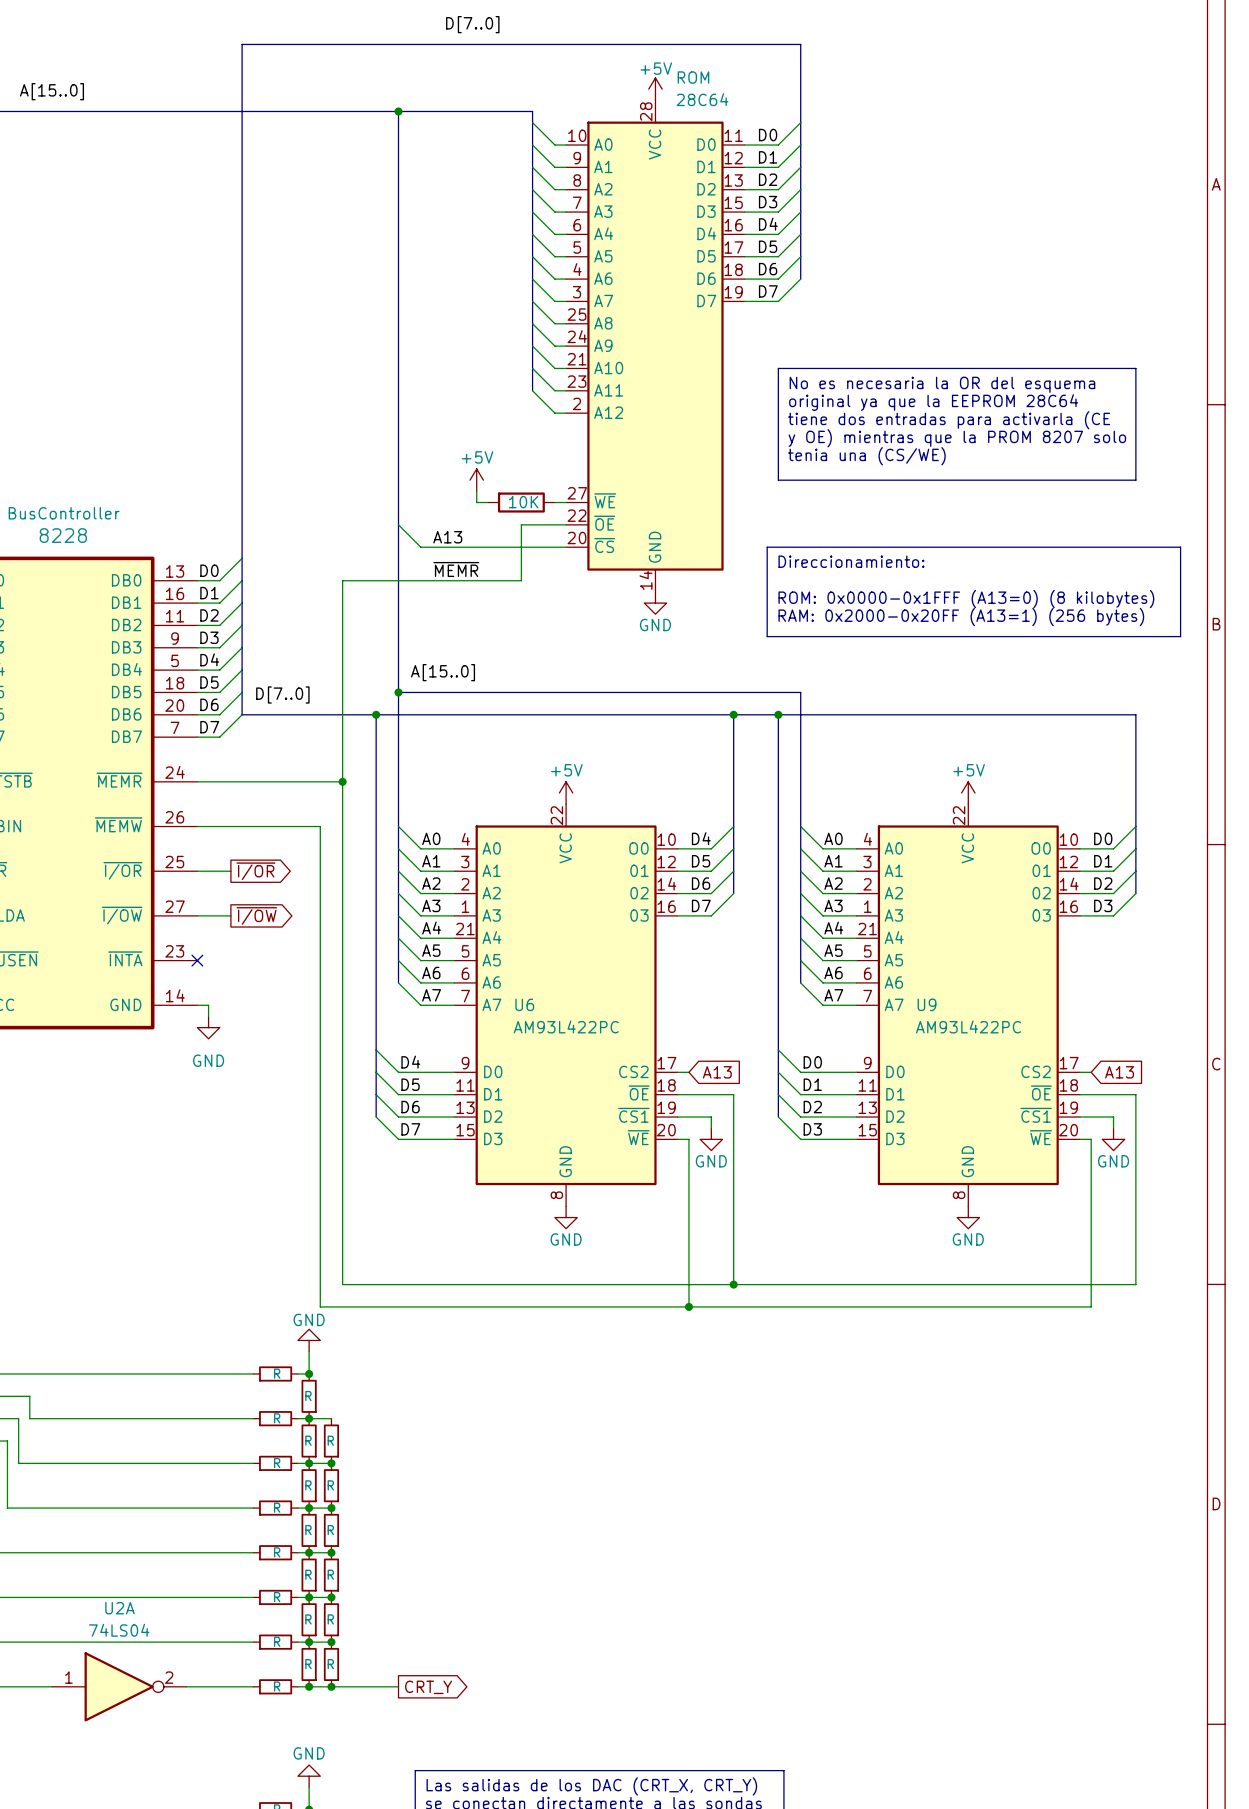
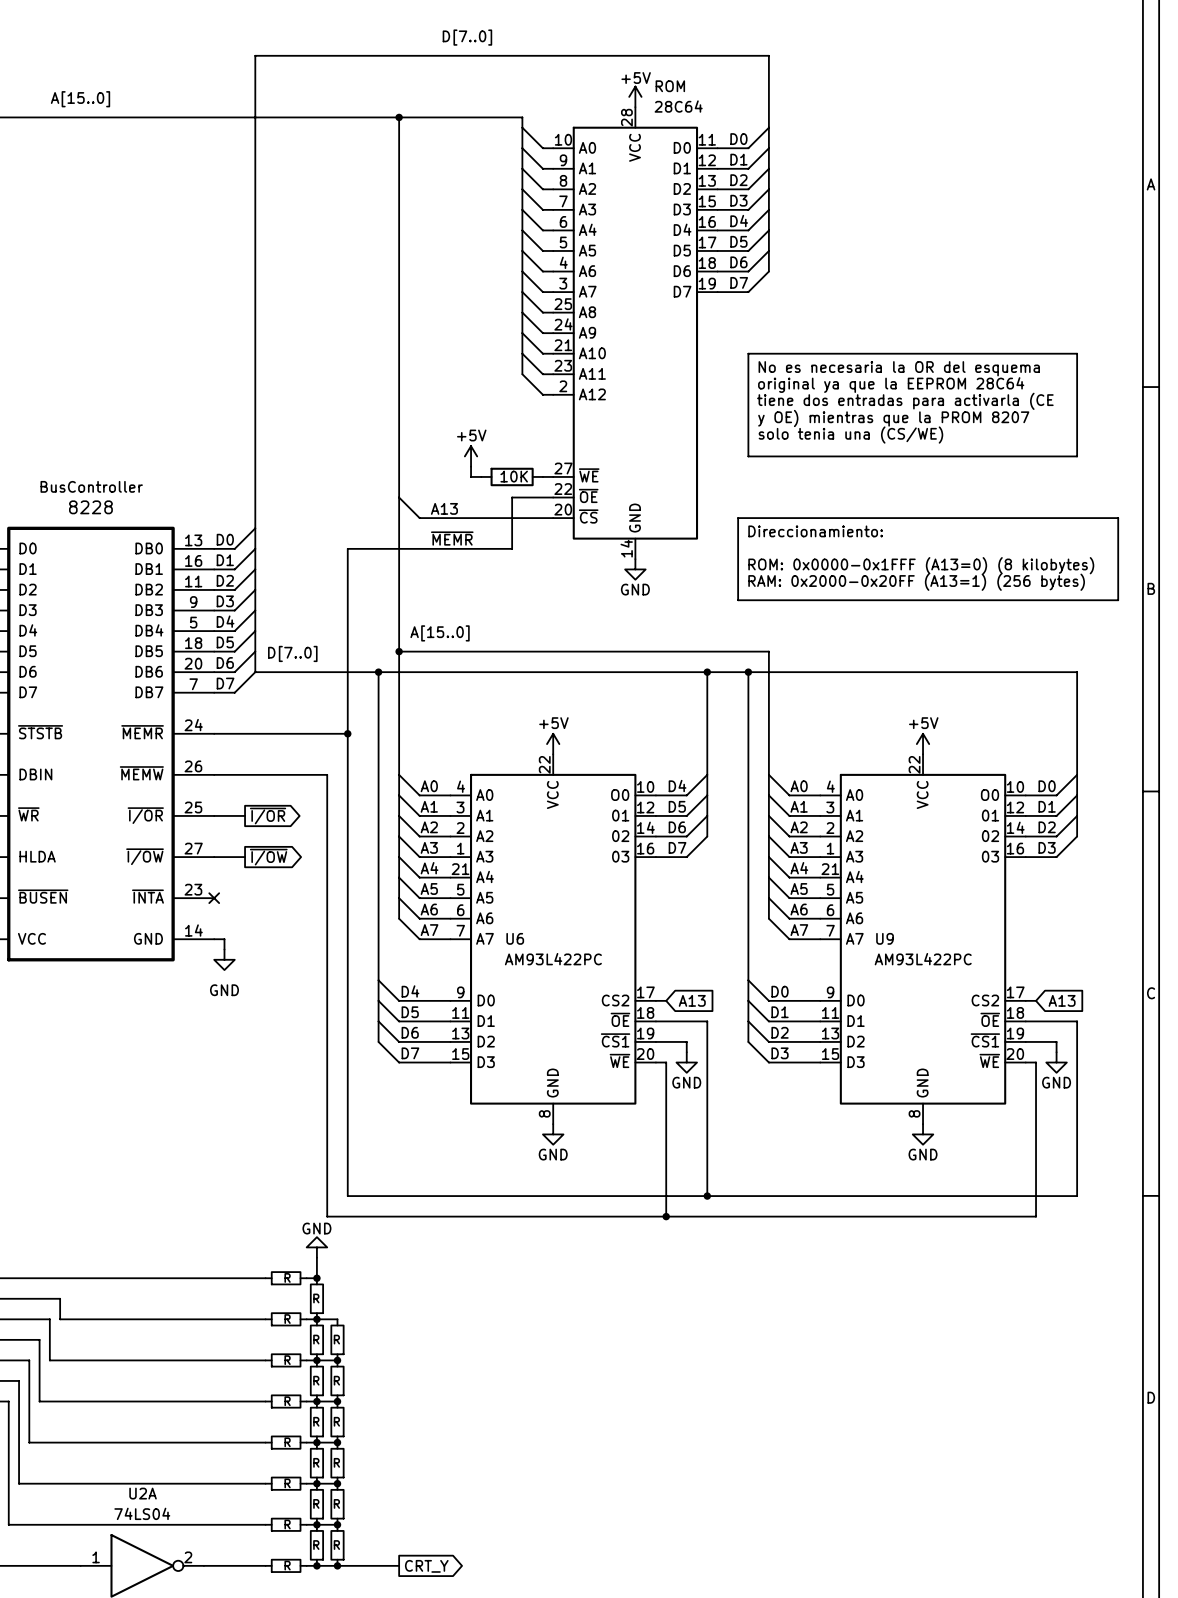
text: y OE) mientras que la PROM 8207 solo (957, 438) -> y OE) mientras que la PROM 8207 (893, 418)
text: tenia una (CS/WE) (866, 456) -> solo tenia una (CS/WE) (850, 435)

